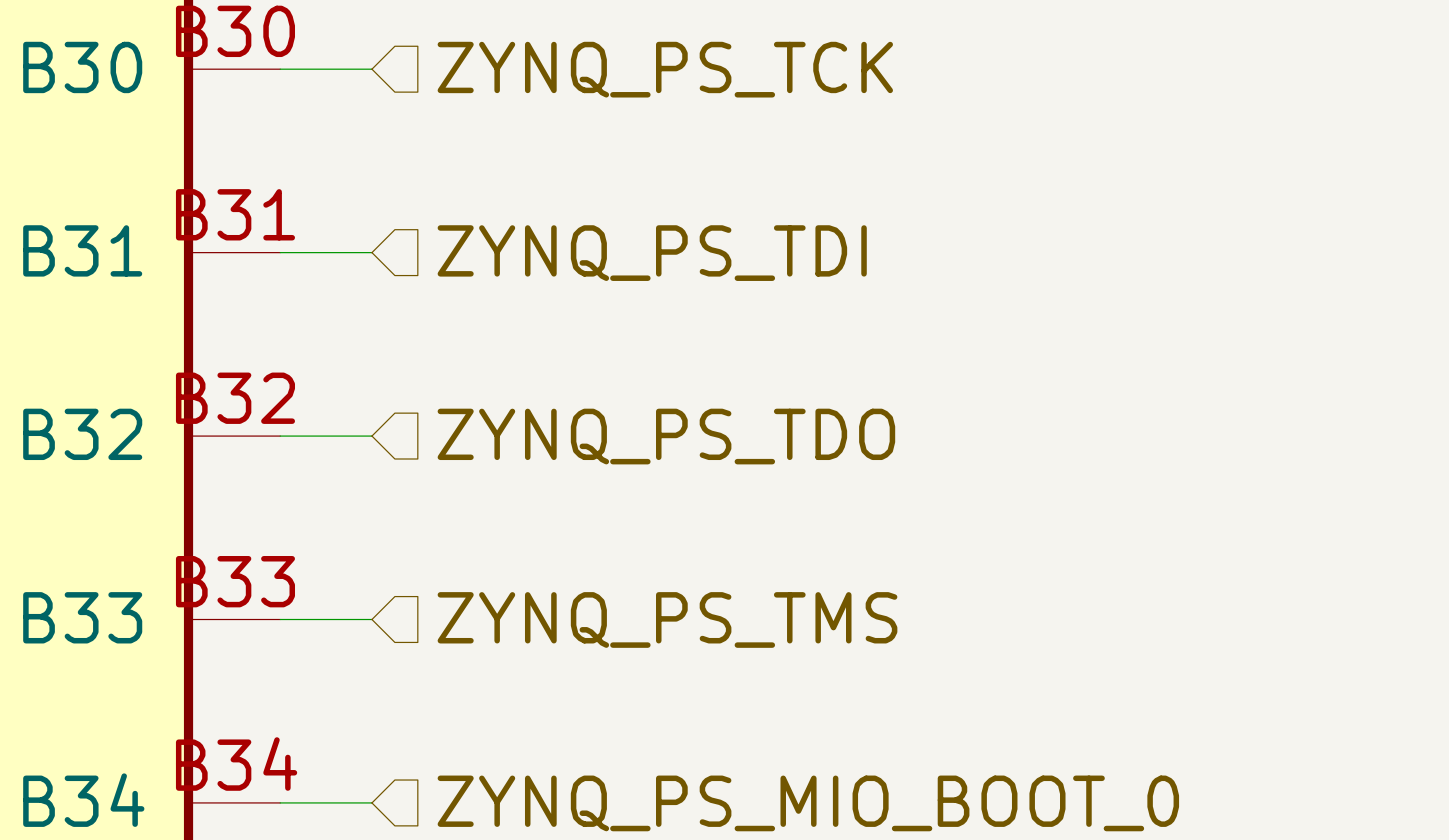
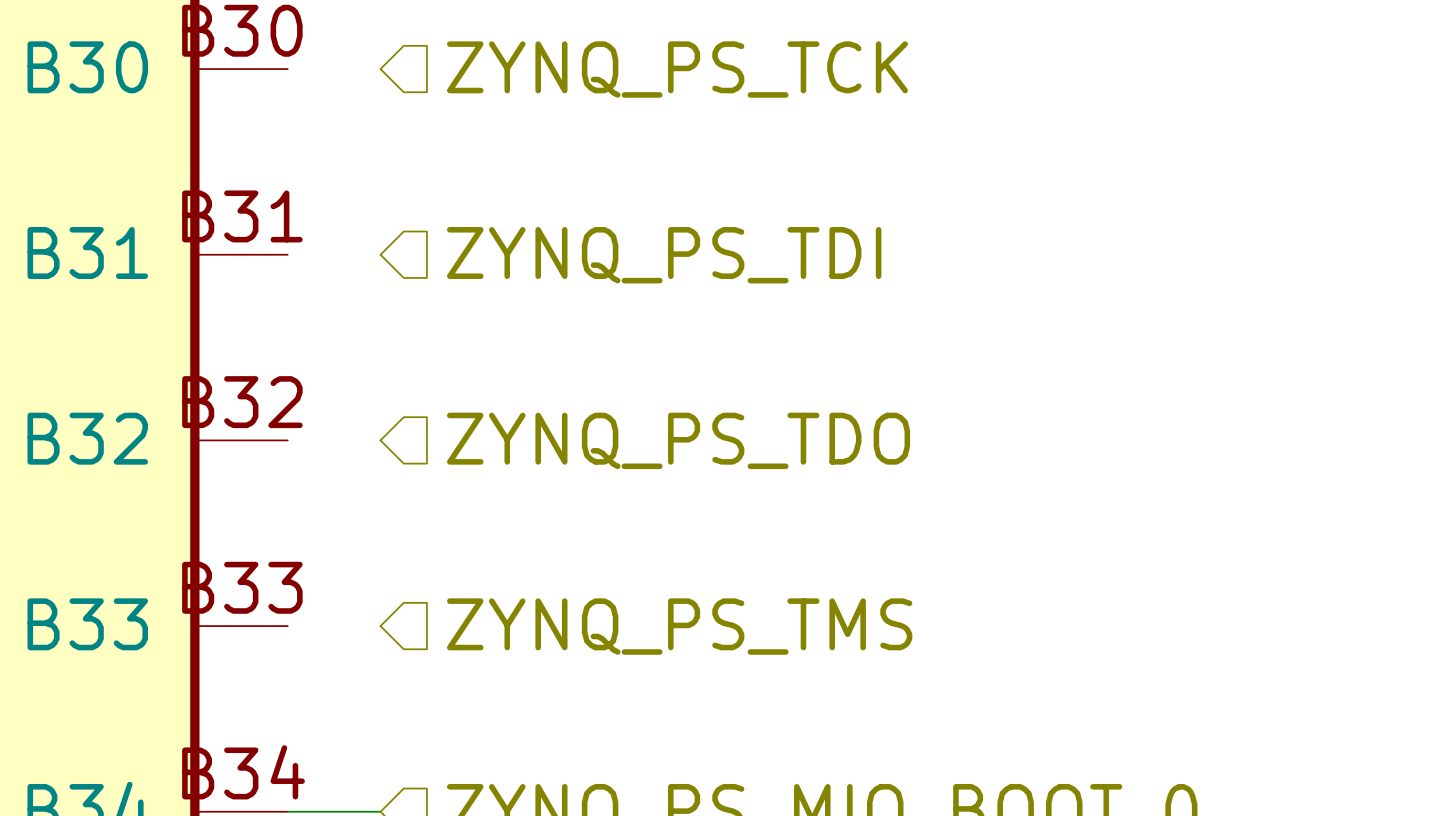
wire: (280, 69) (371, 69) -> none
wire: (280, 252) (371, 252) -> none
wire: (280, 436) (371, 436) -> none
wire: (280, 619) (371, 619) -> none

